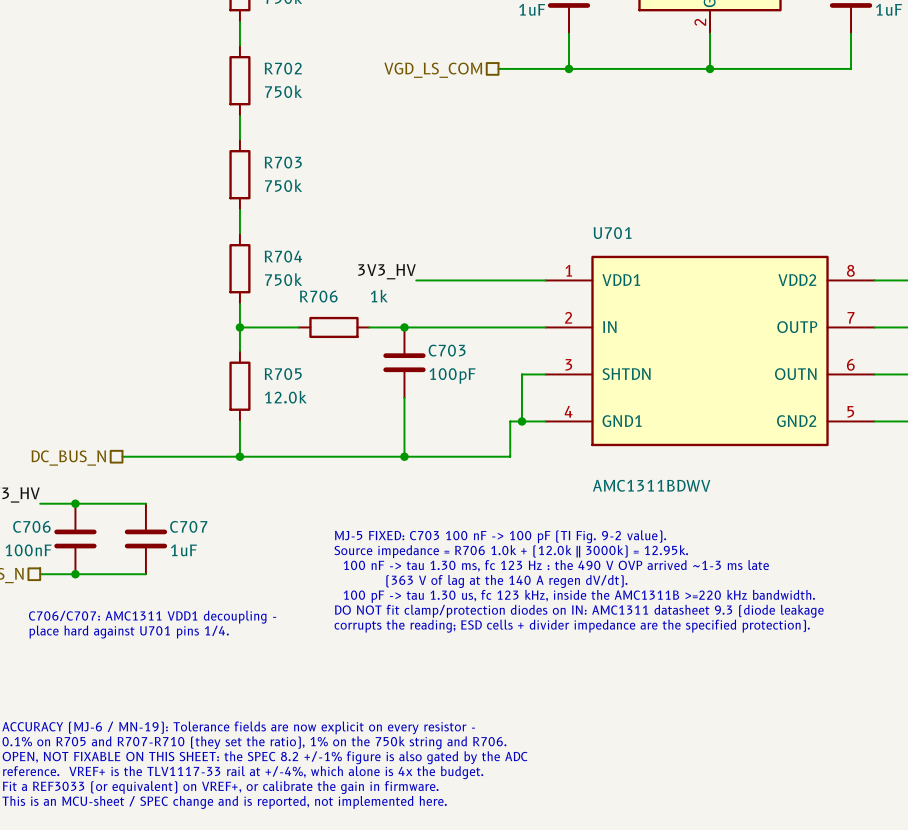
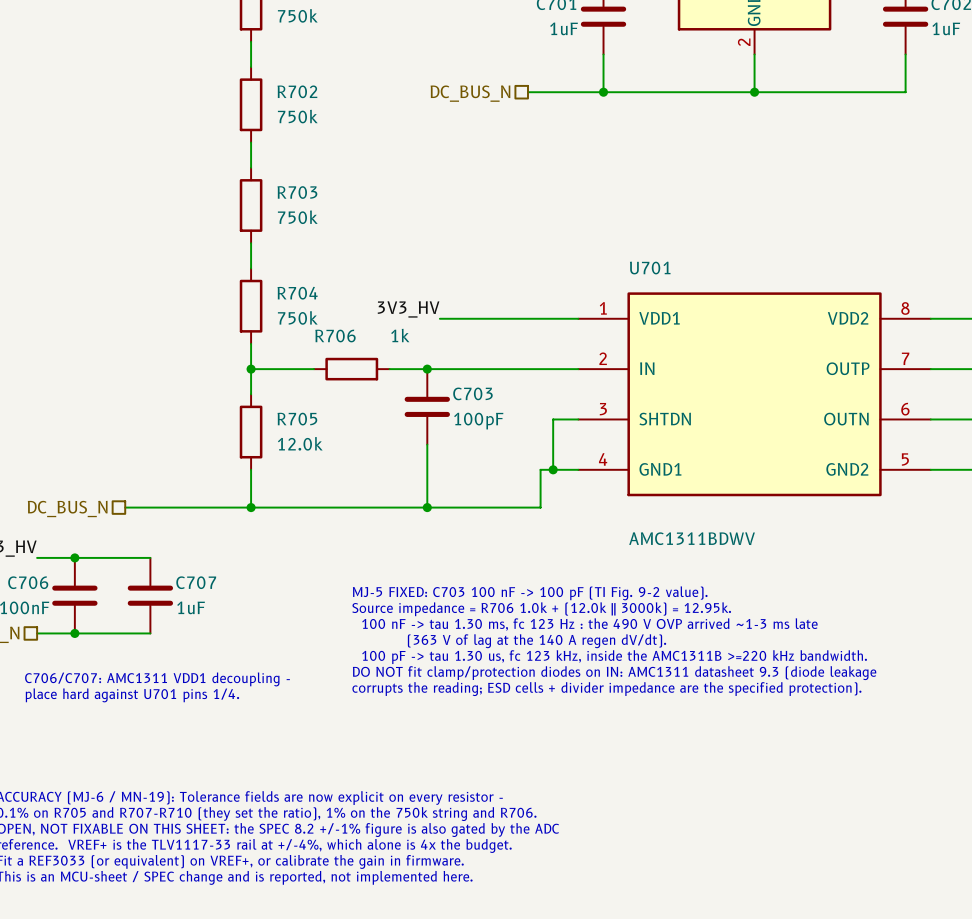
hierarchical label: VGD_LS_COM (433, 70) -> DC_BUS_N (470, 93)

